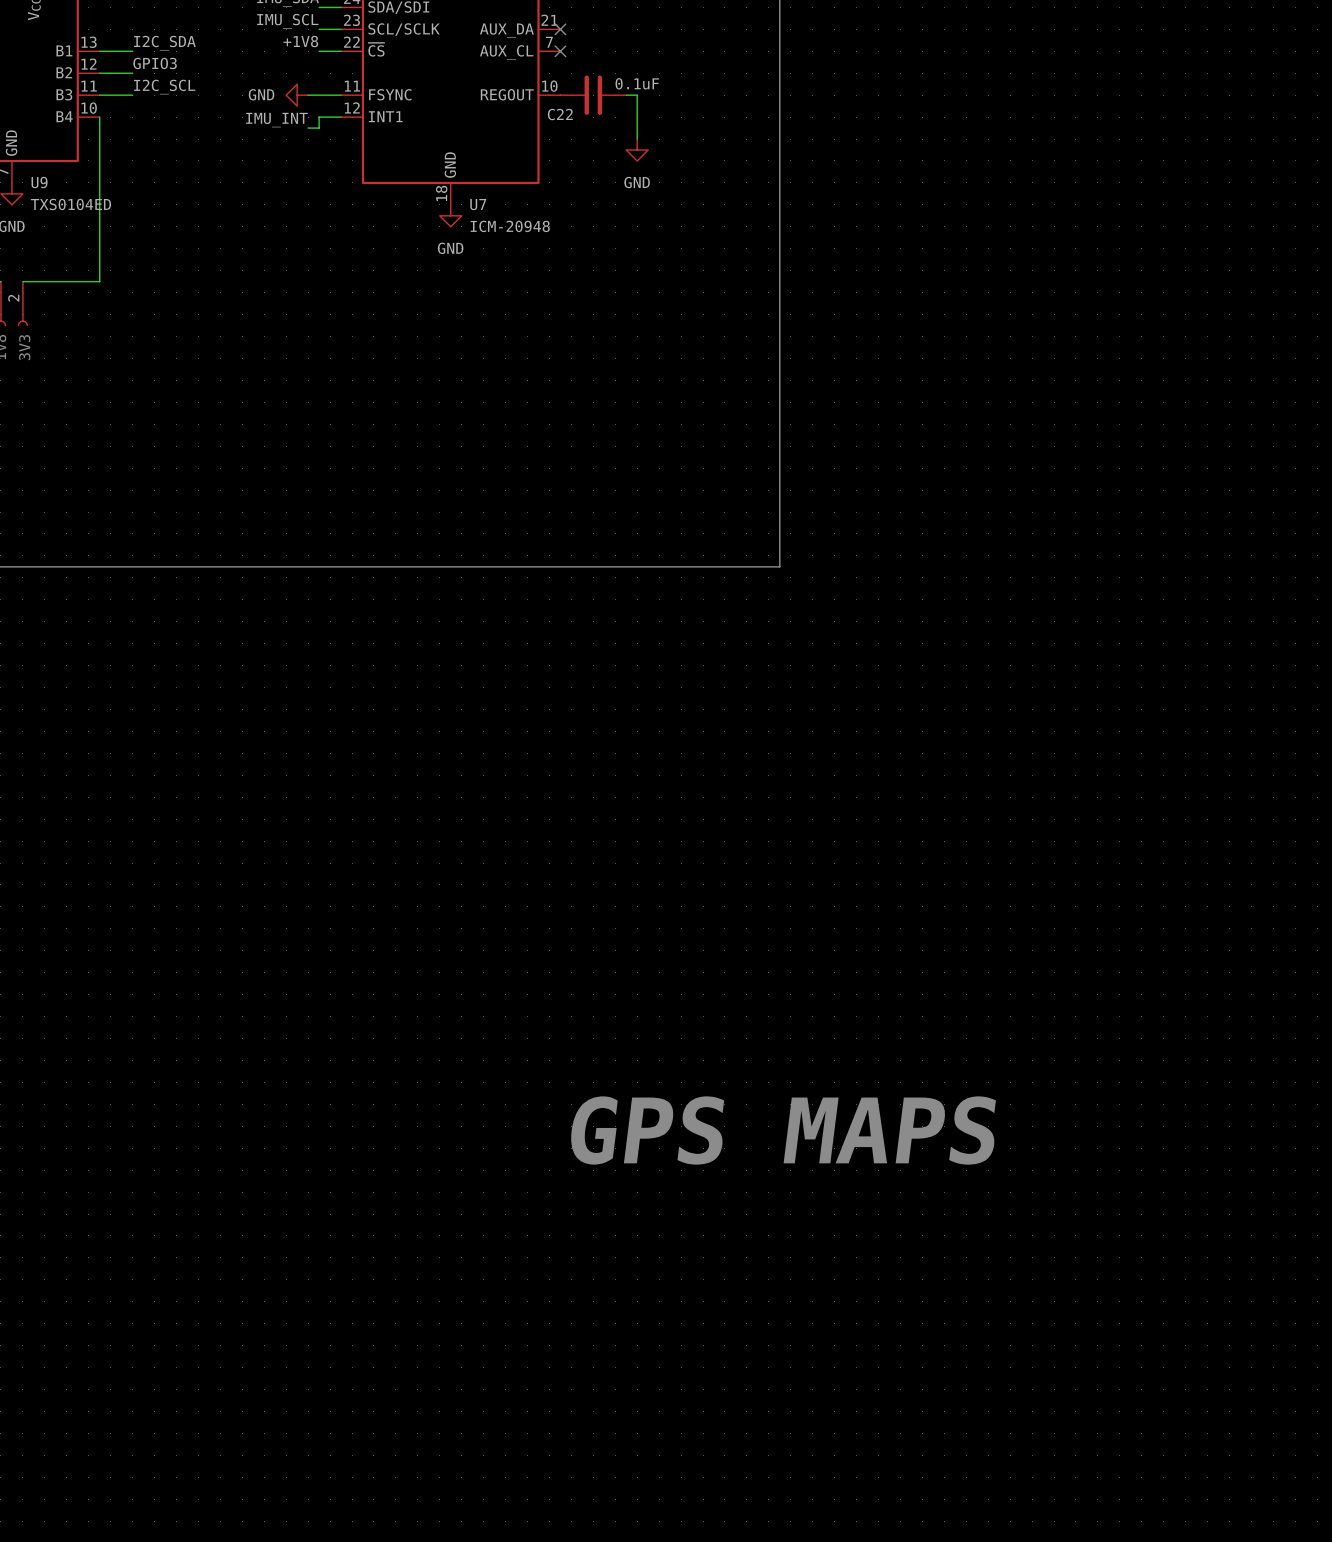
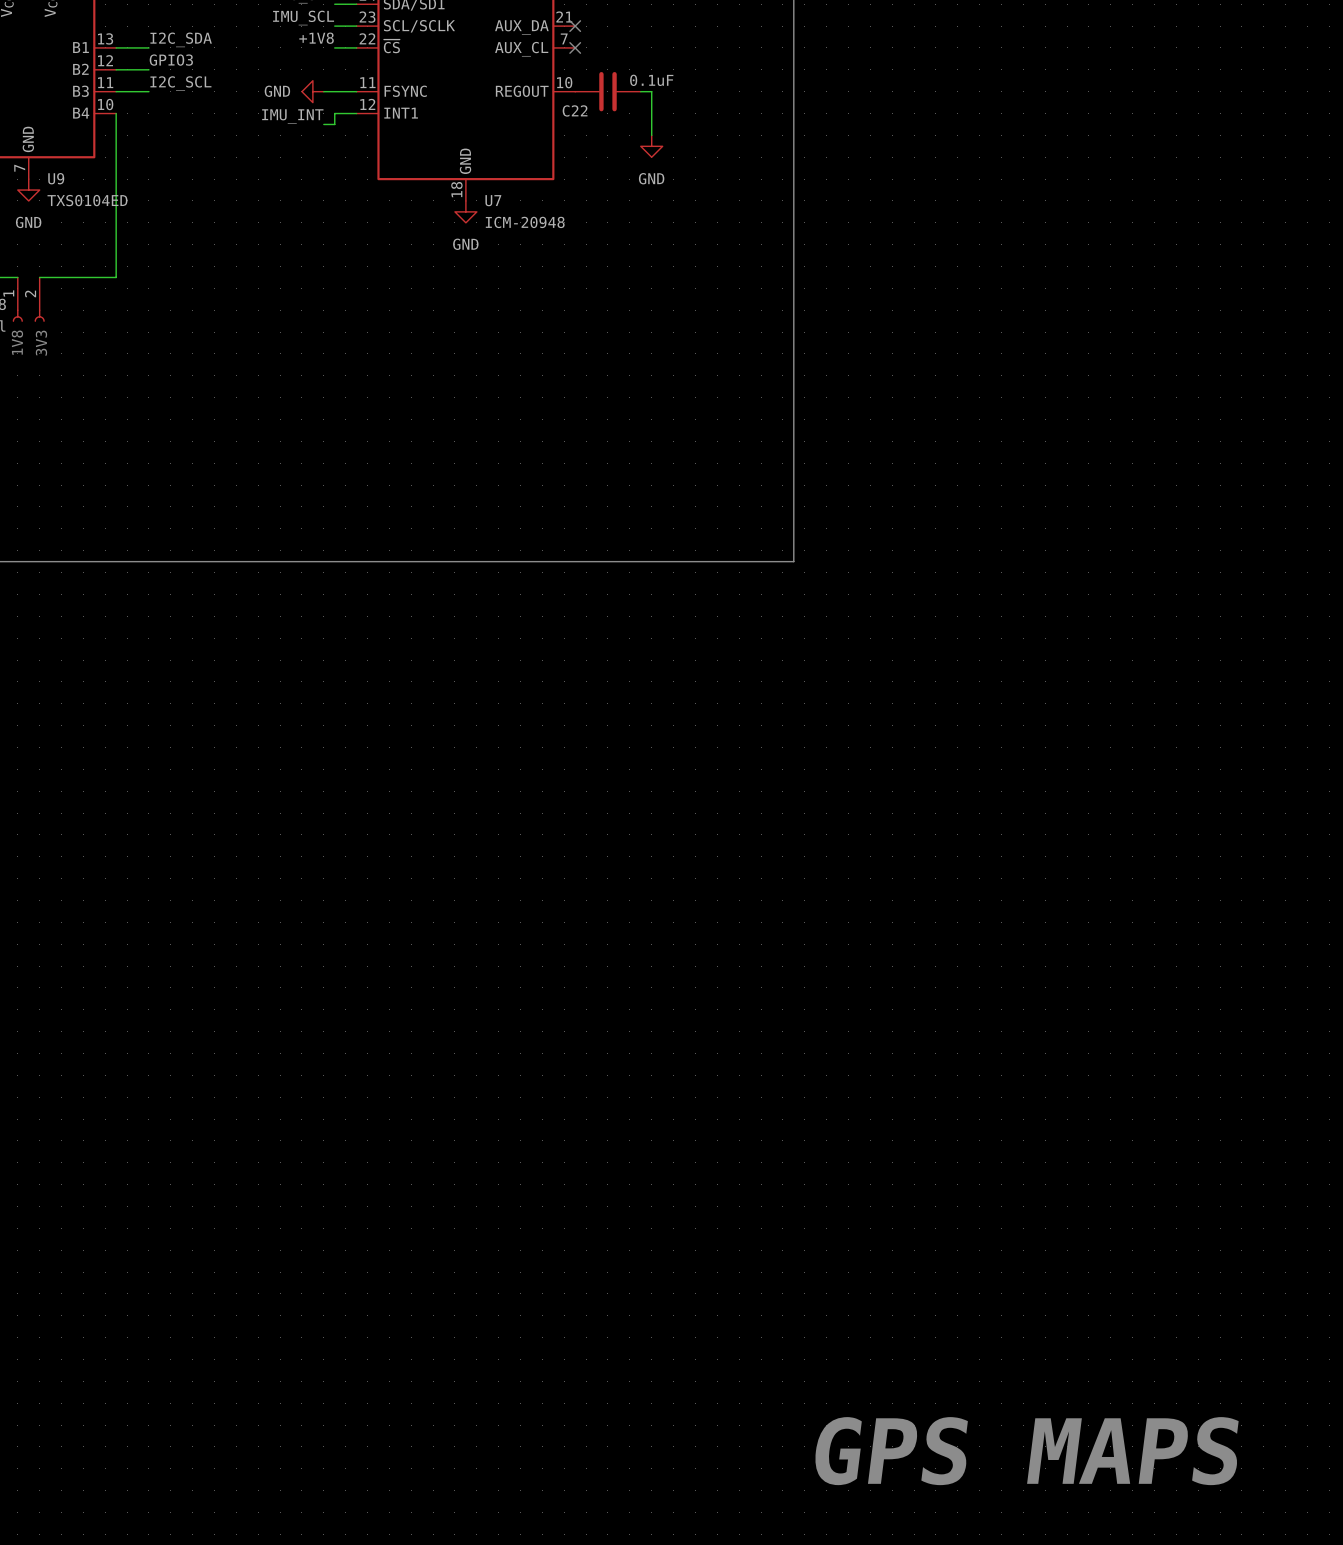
text: GPS MAPS (782, 1130) -> none
text: none -> GPS MAPS (1026, 1451)

